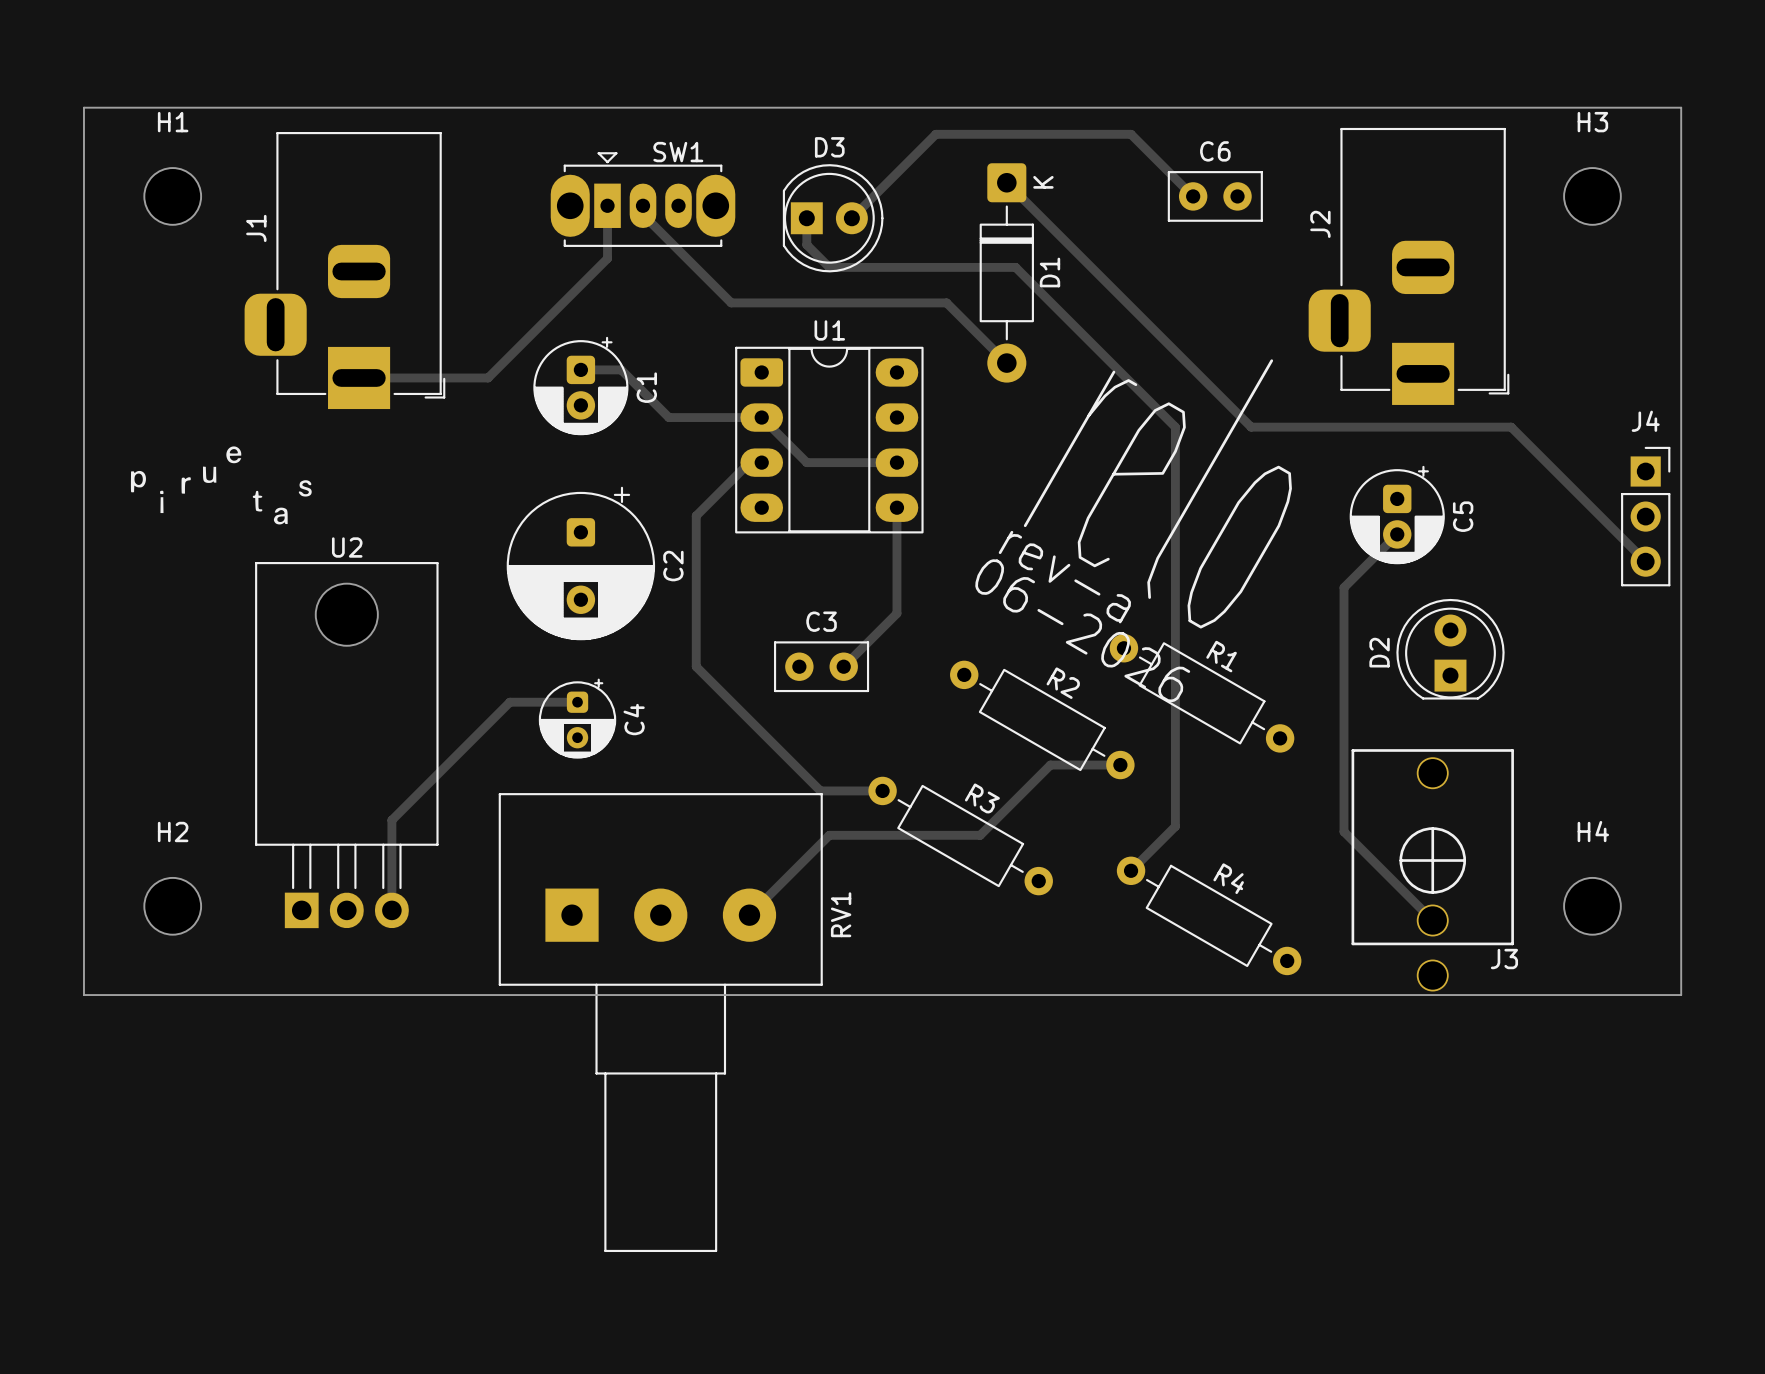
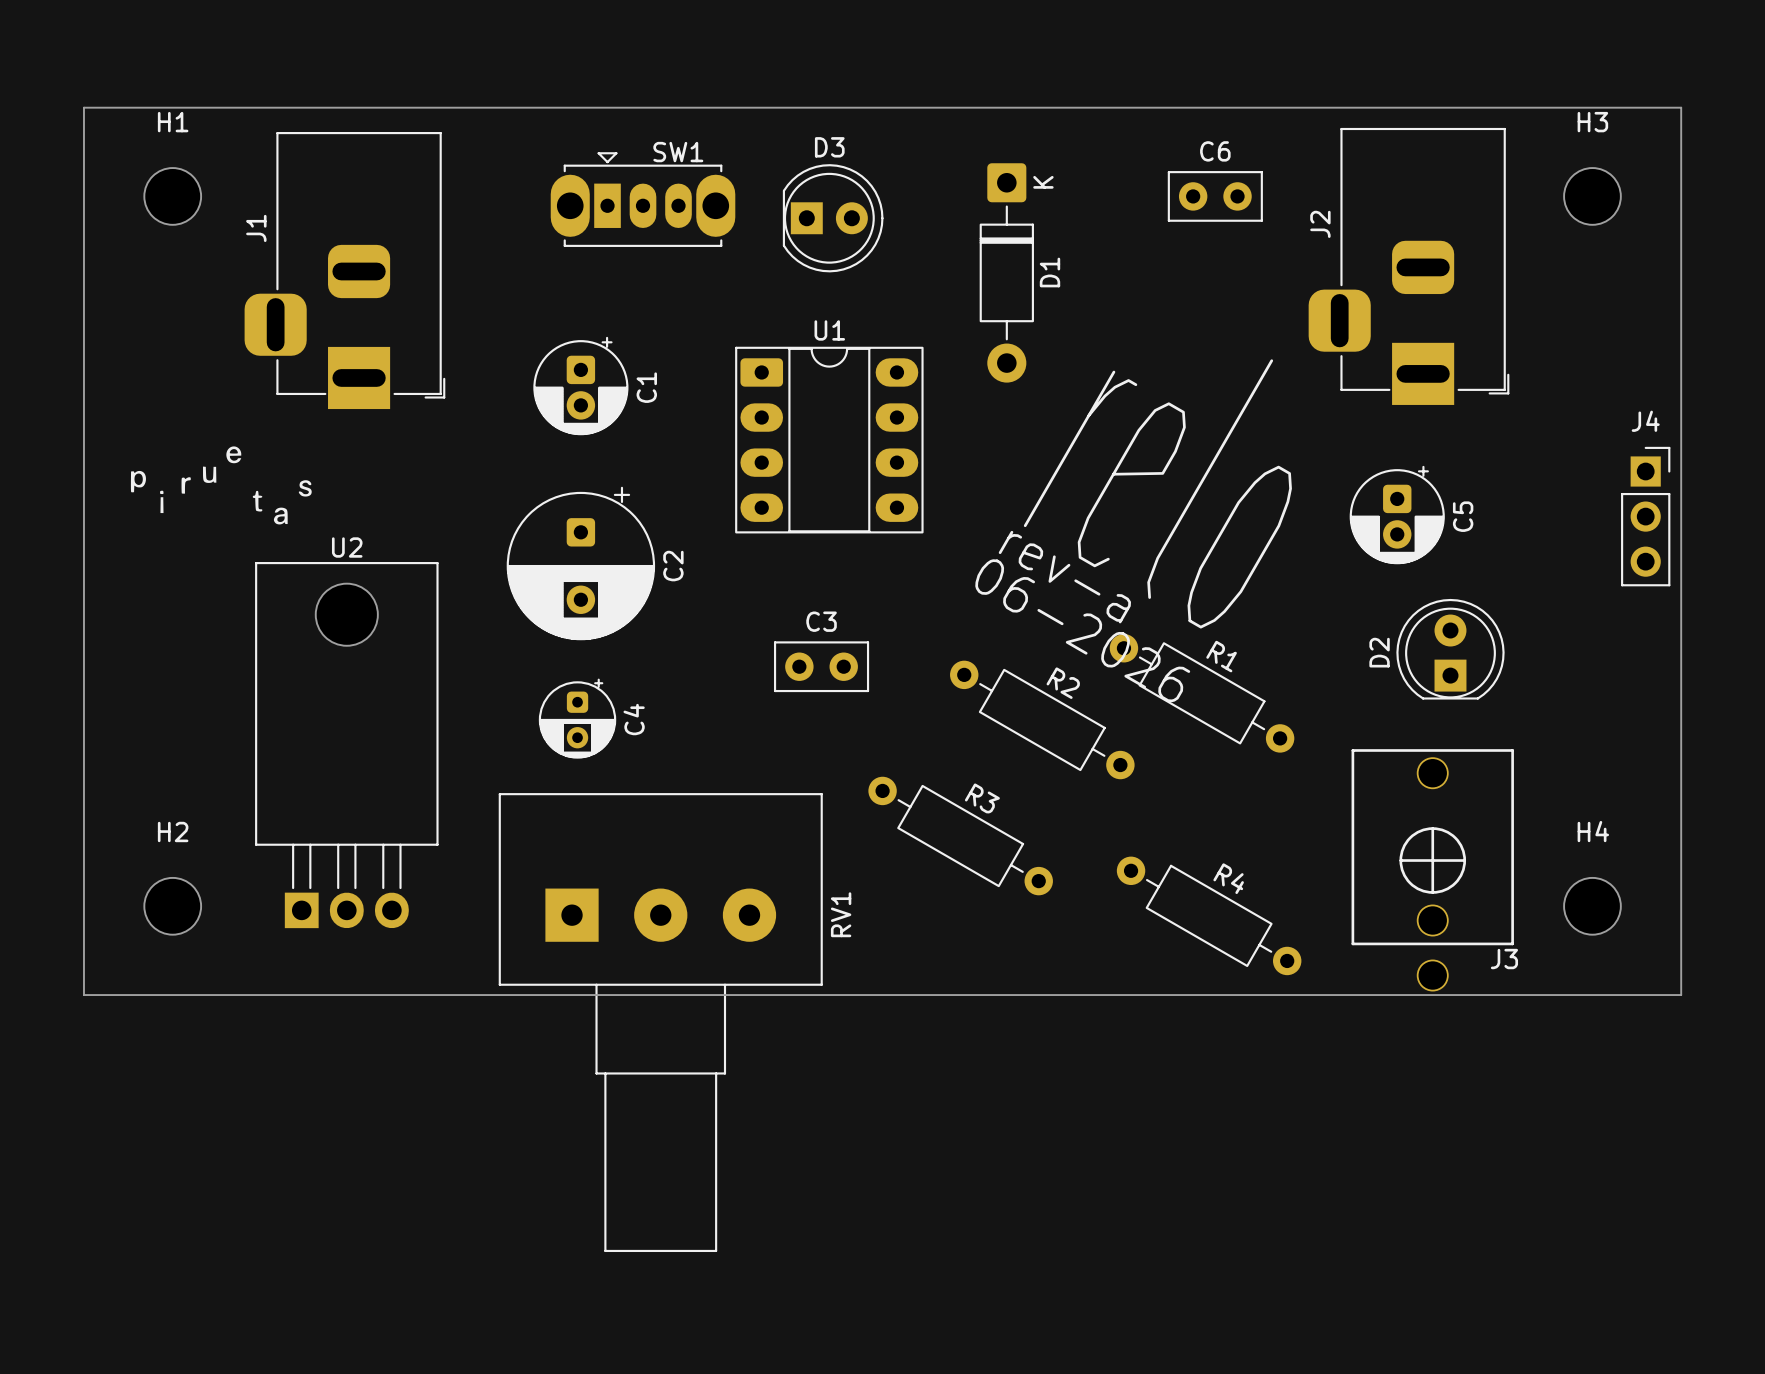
track: (1006, 182) (1251, 427) (1511, 427) (1645, 561) -> none
track: (1193, 196) (1131, 134) (935, 134) (851, 218) -> none
track: (607, 205) (607, 258) (488, 377) (359, 377) -> none
track: (643, 205) (643, 214) (731, 302) (946, 302) (1006, 363) -> none
track: (806, 218) (806, 244) (829, 267) (1015, 267) (1175, 427) (1175, 826) (1131, 870) -> none
track: (580, 369) (621, 369) (668, 417) (761, 417) (806, 462) (896, 462) -> none
track: (761, 462) (749, 462) (696, 515) (696, 666) (820, 790) (882, 790) -> none
track: (896, 507) (896, 613) (843, 666) -> none
track: (1397, 534) (1344, 587) (1344, 831) (1432, 920) -> none
track: (577, 702) (509, 702) (391, 820) (391, 910) -> none
track: (1120, 765) (1050, 765) (980, 835) (829, 835) (749, 915) -> none

